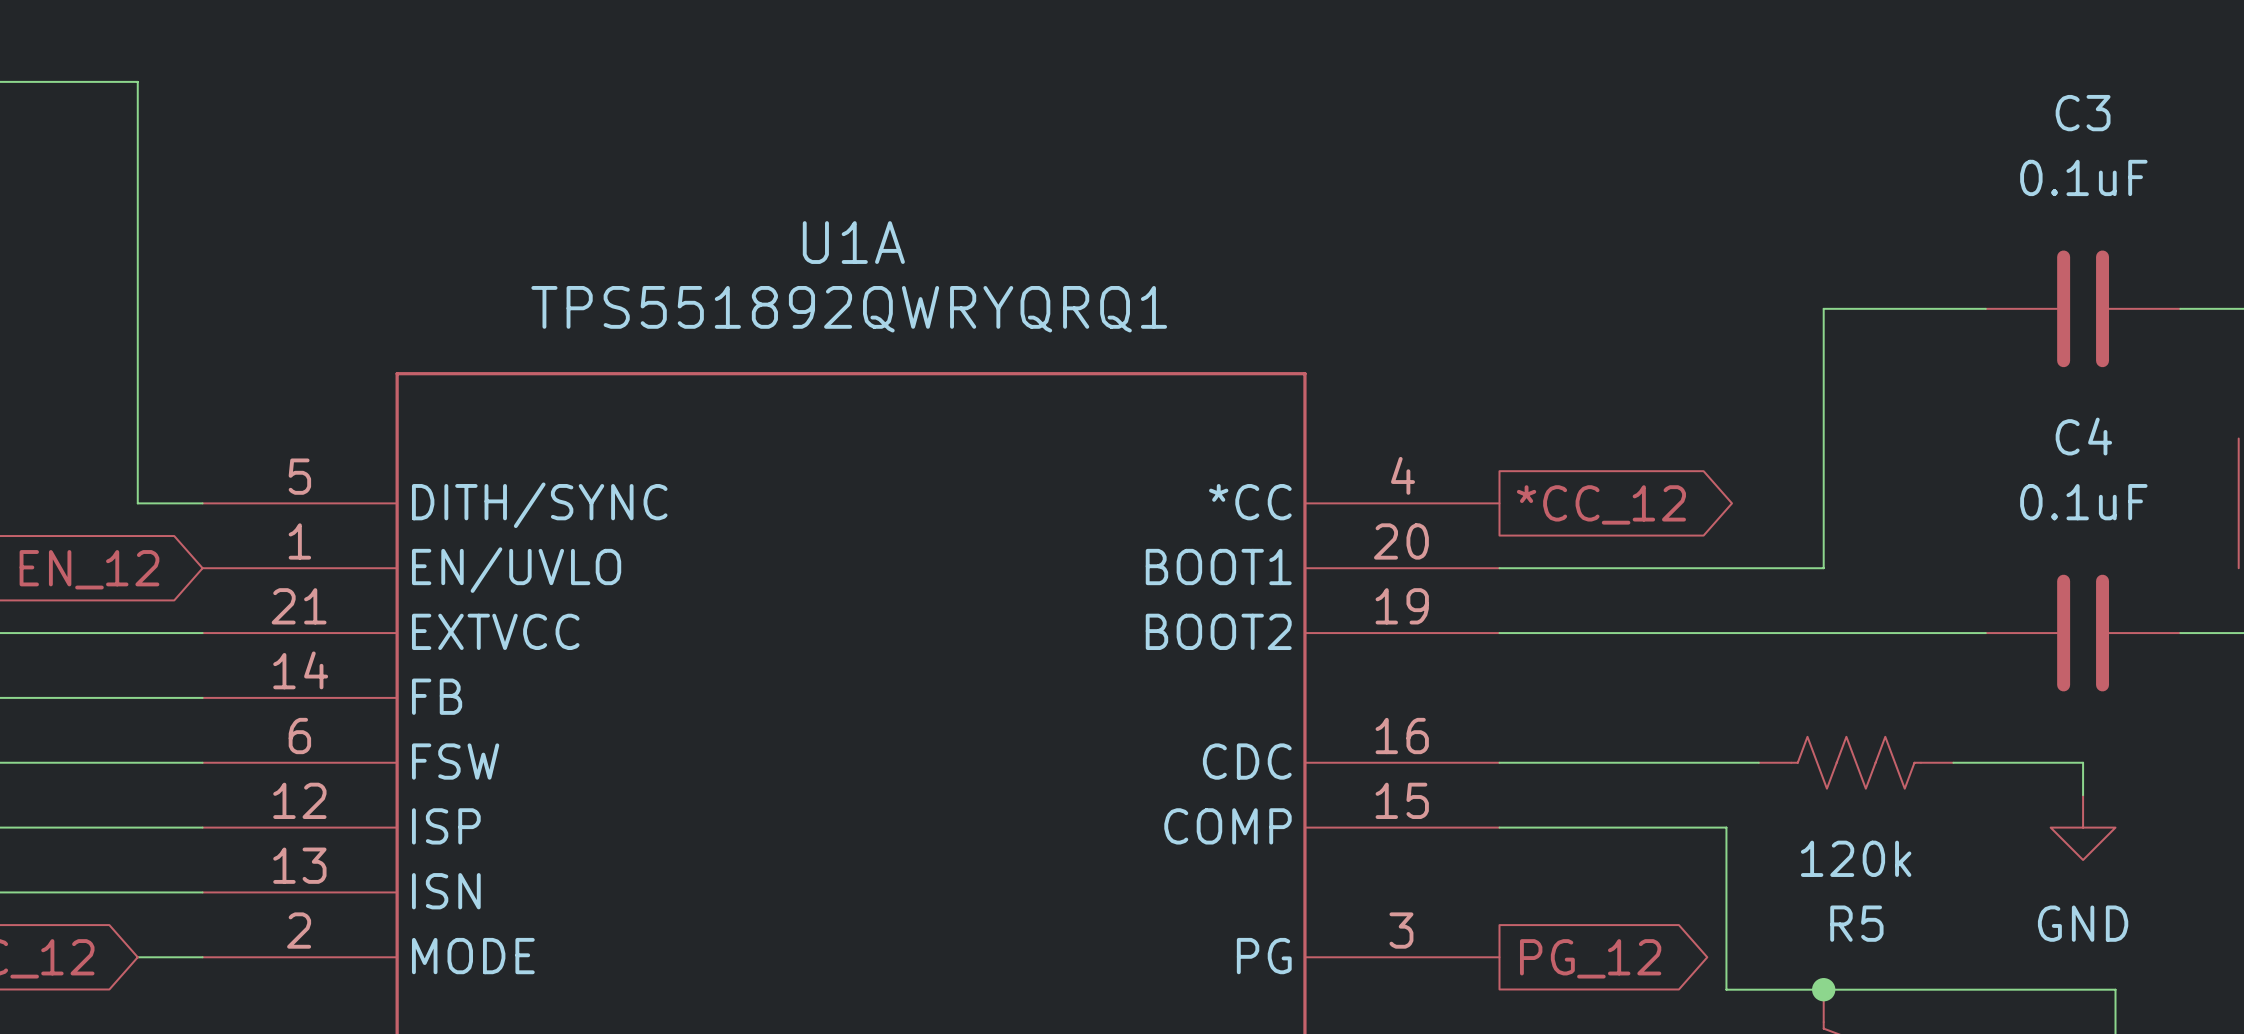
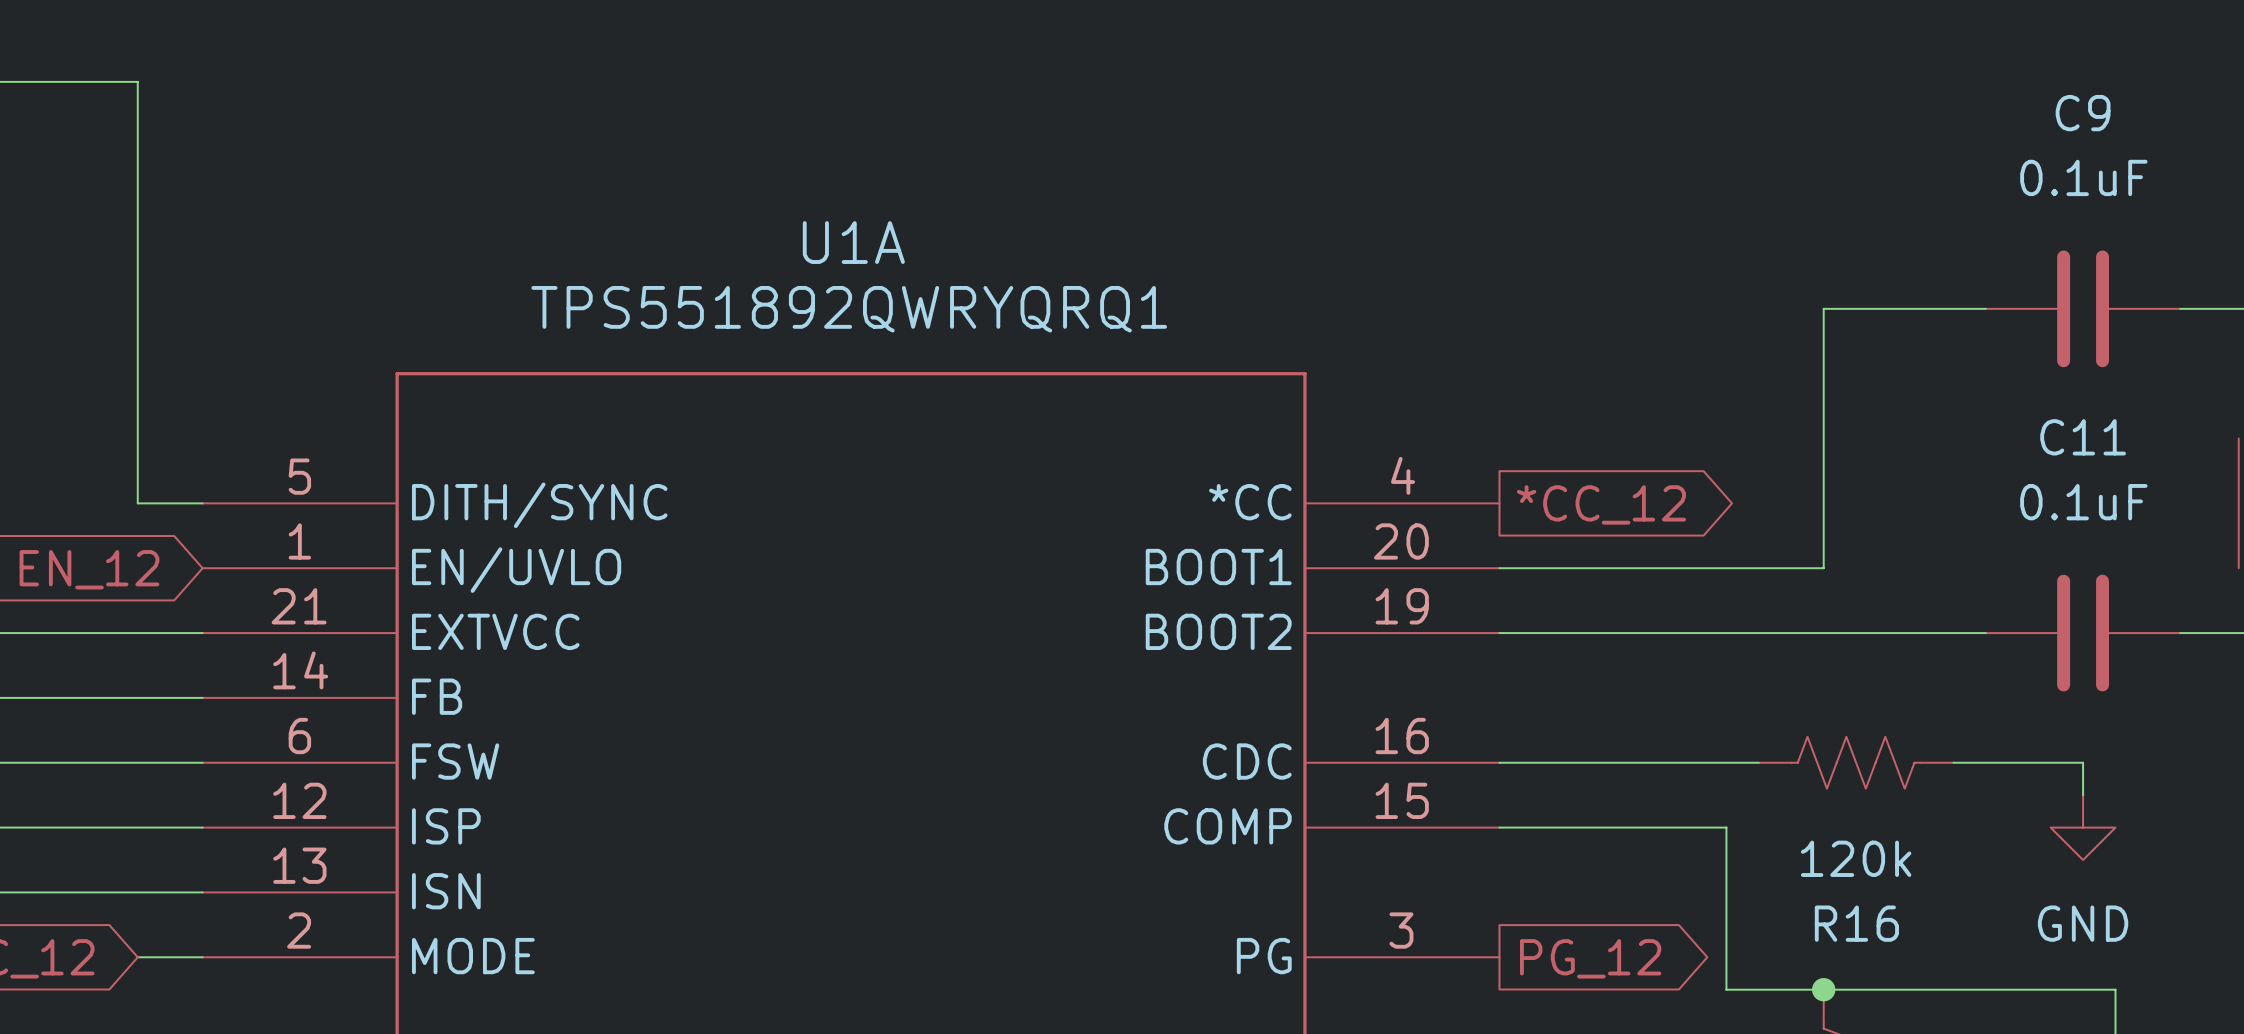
C3 name: C3 (2083, 113) -> C9 (2083, 113)
C4 name: C4 (2083, 436) -> C11 (2083, 437)
R5 name: R5 (1856, 923) -> R16 (1856, 923)

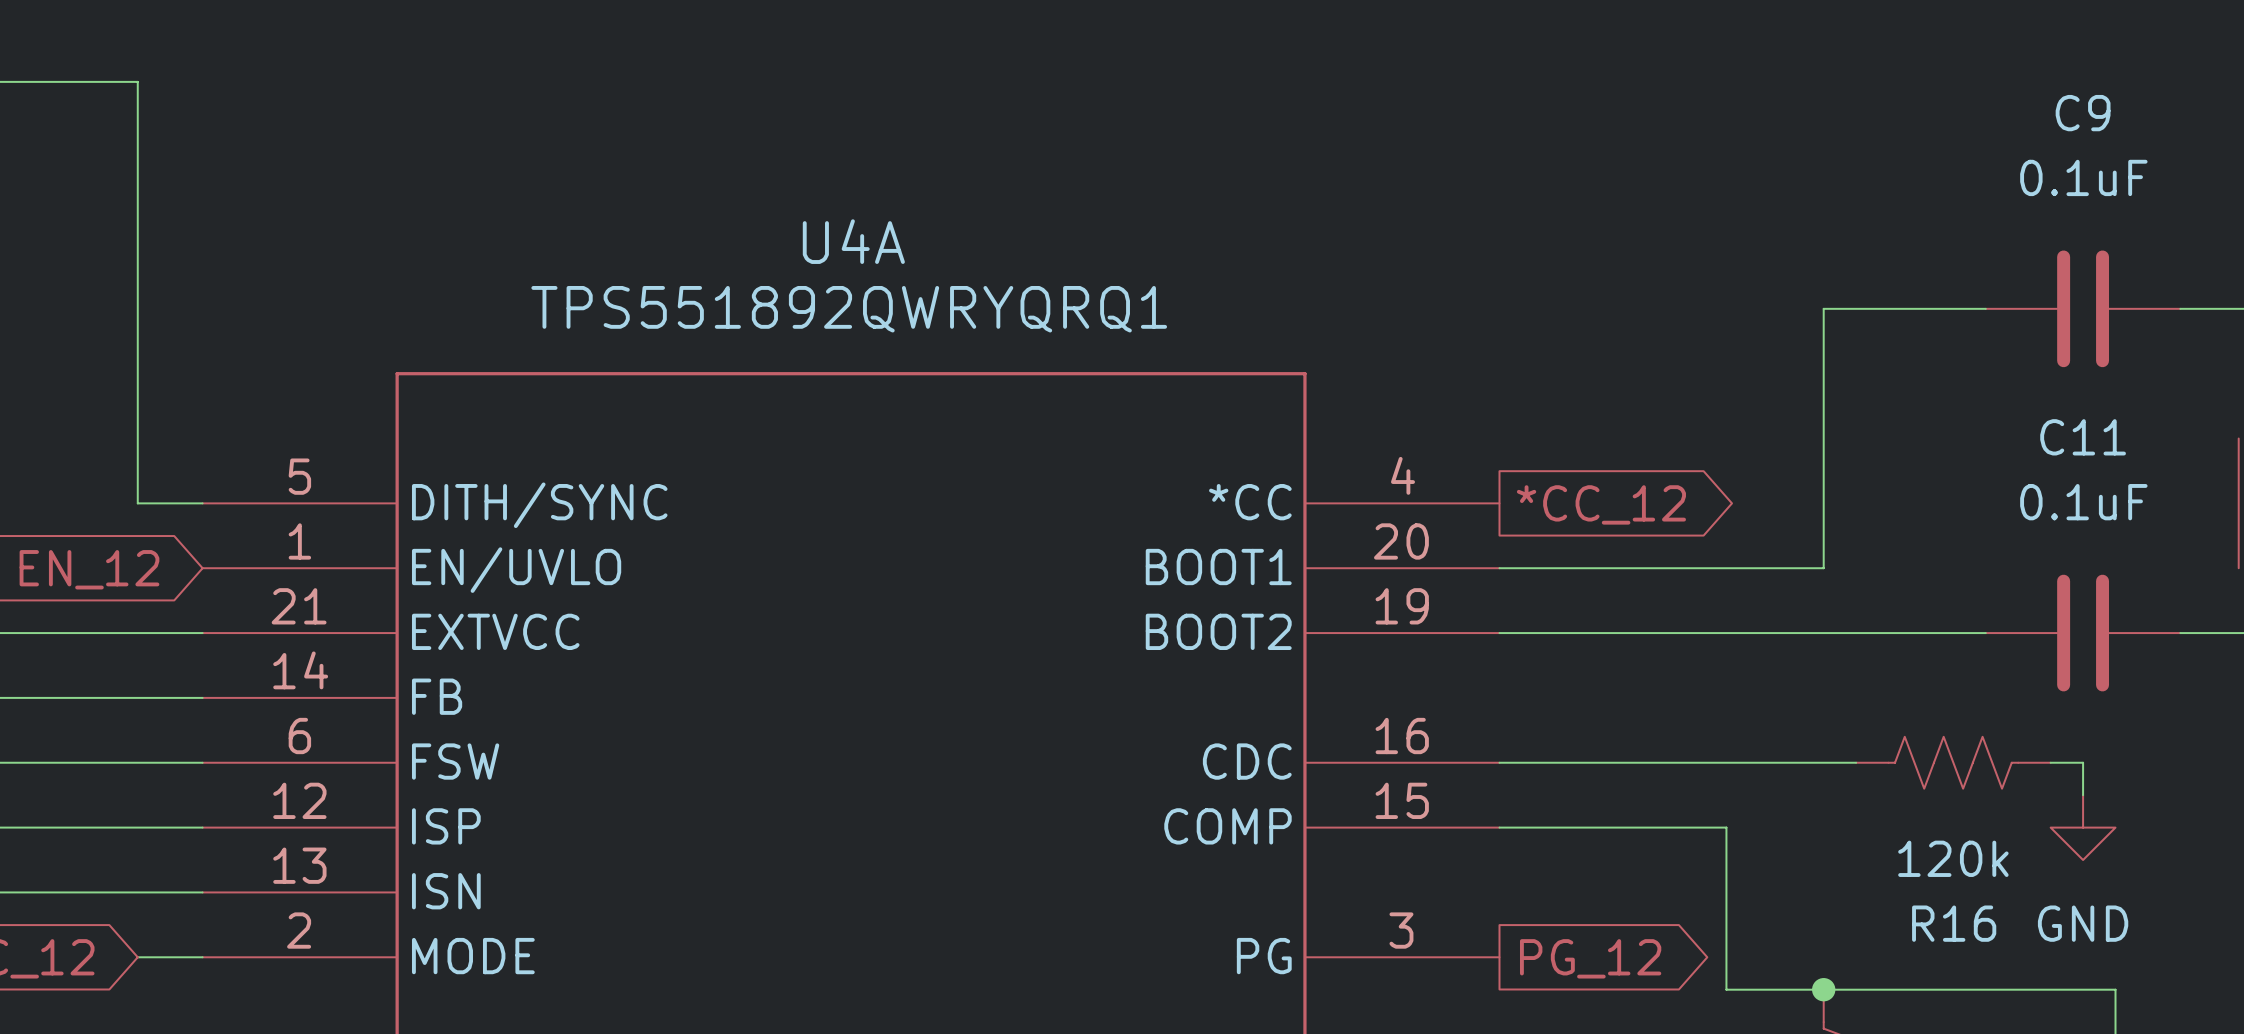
U1A name: U1A (853, 242) -> U4A (853, 241)
R16 position: (1856, 762) -> (1953, 762)
wire: (1953, 762) (2050, 762) -> (1758, 762) (1856, 762)

